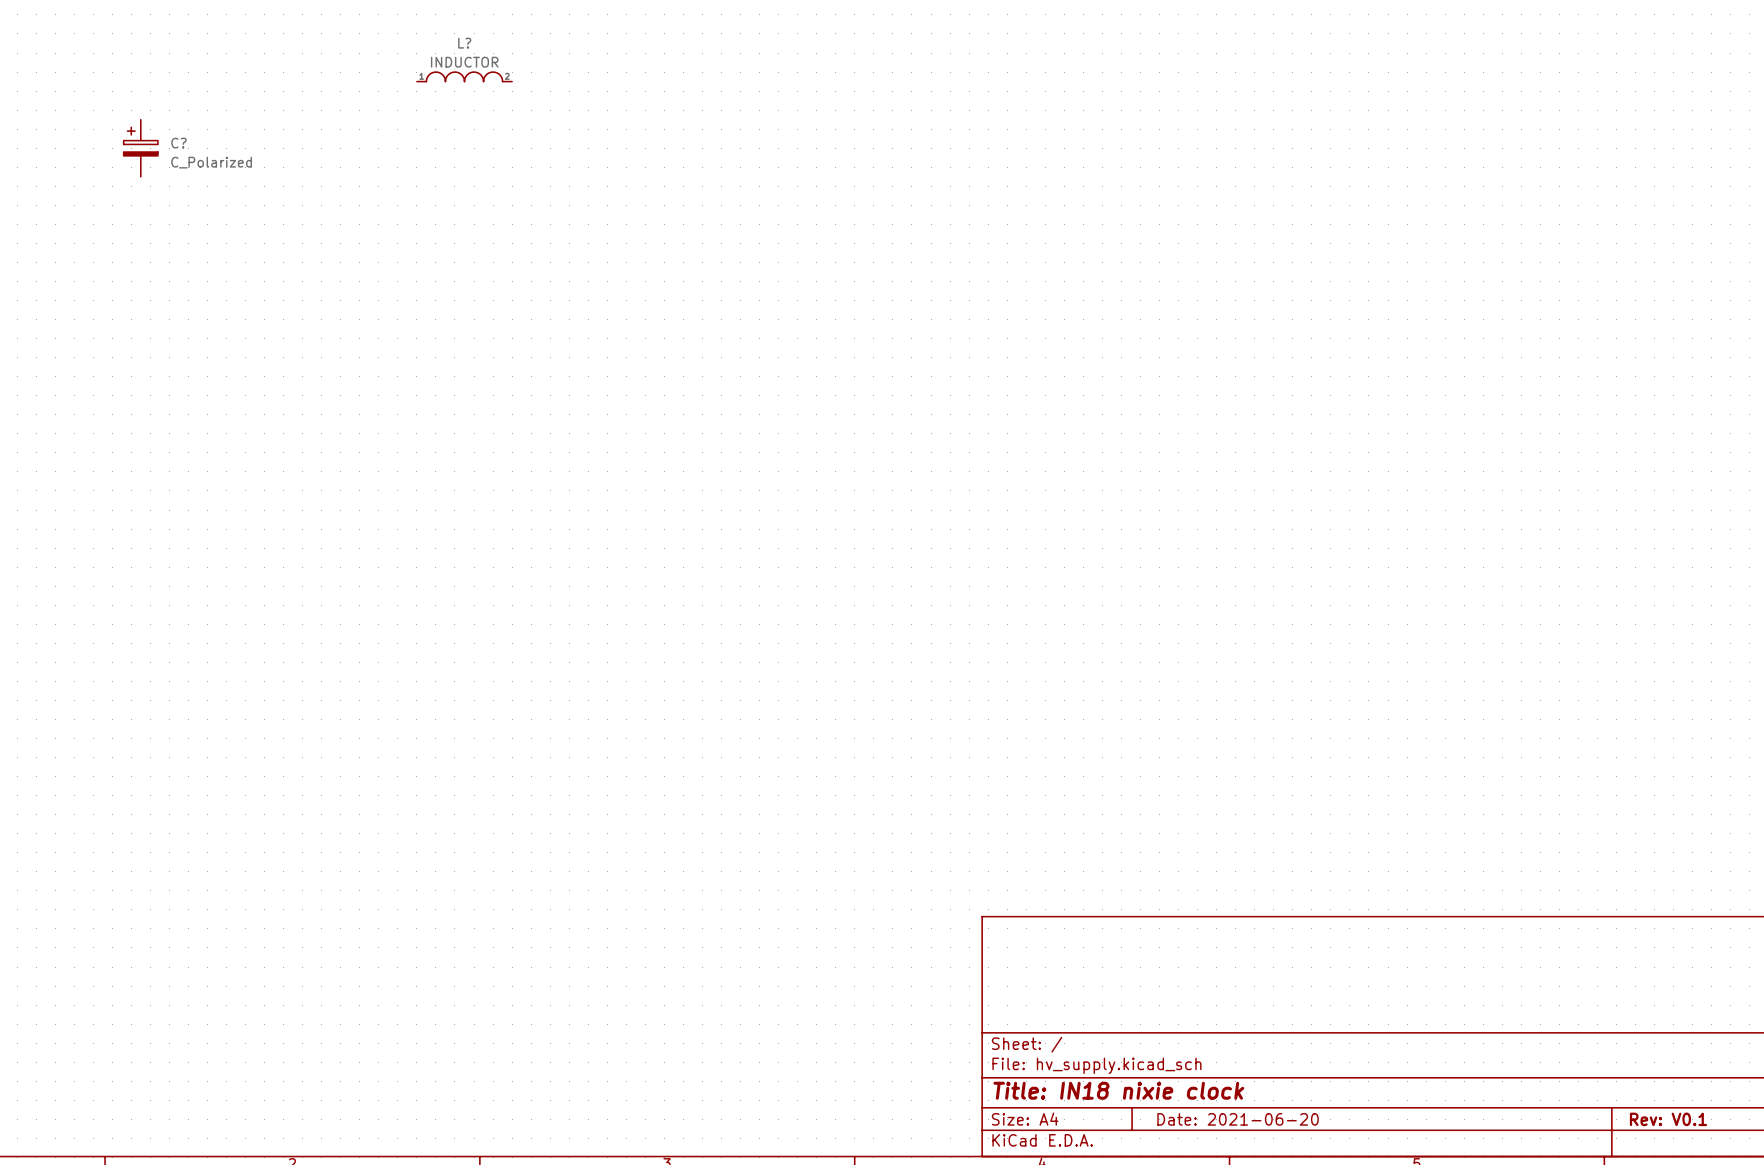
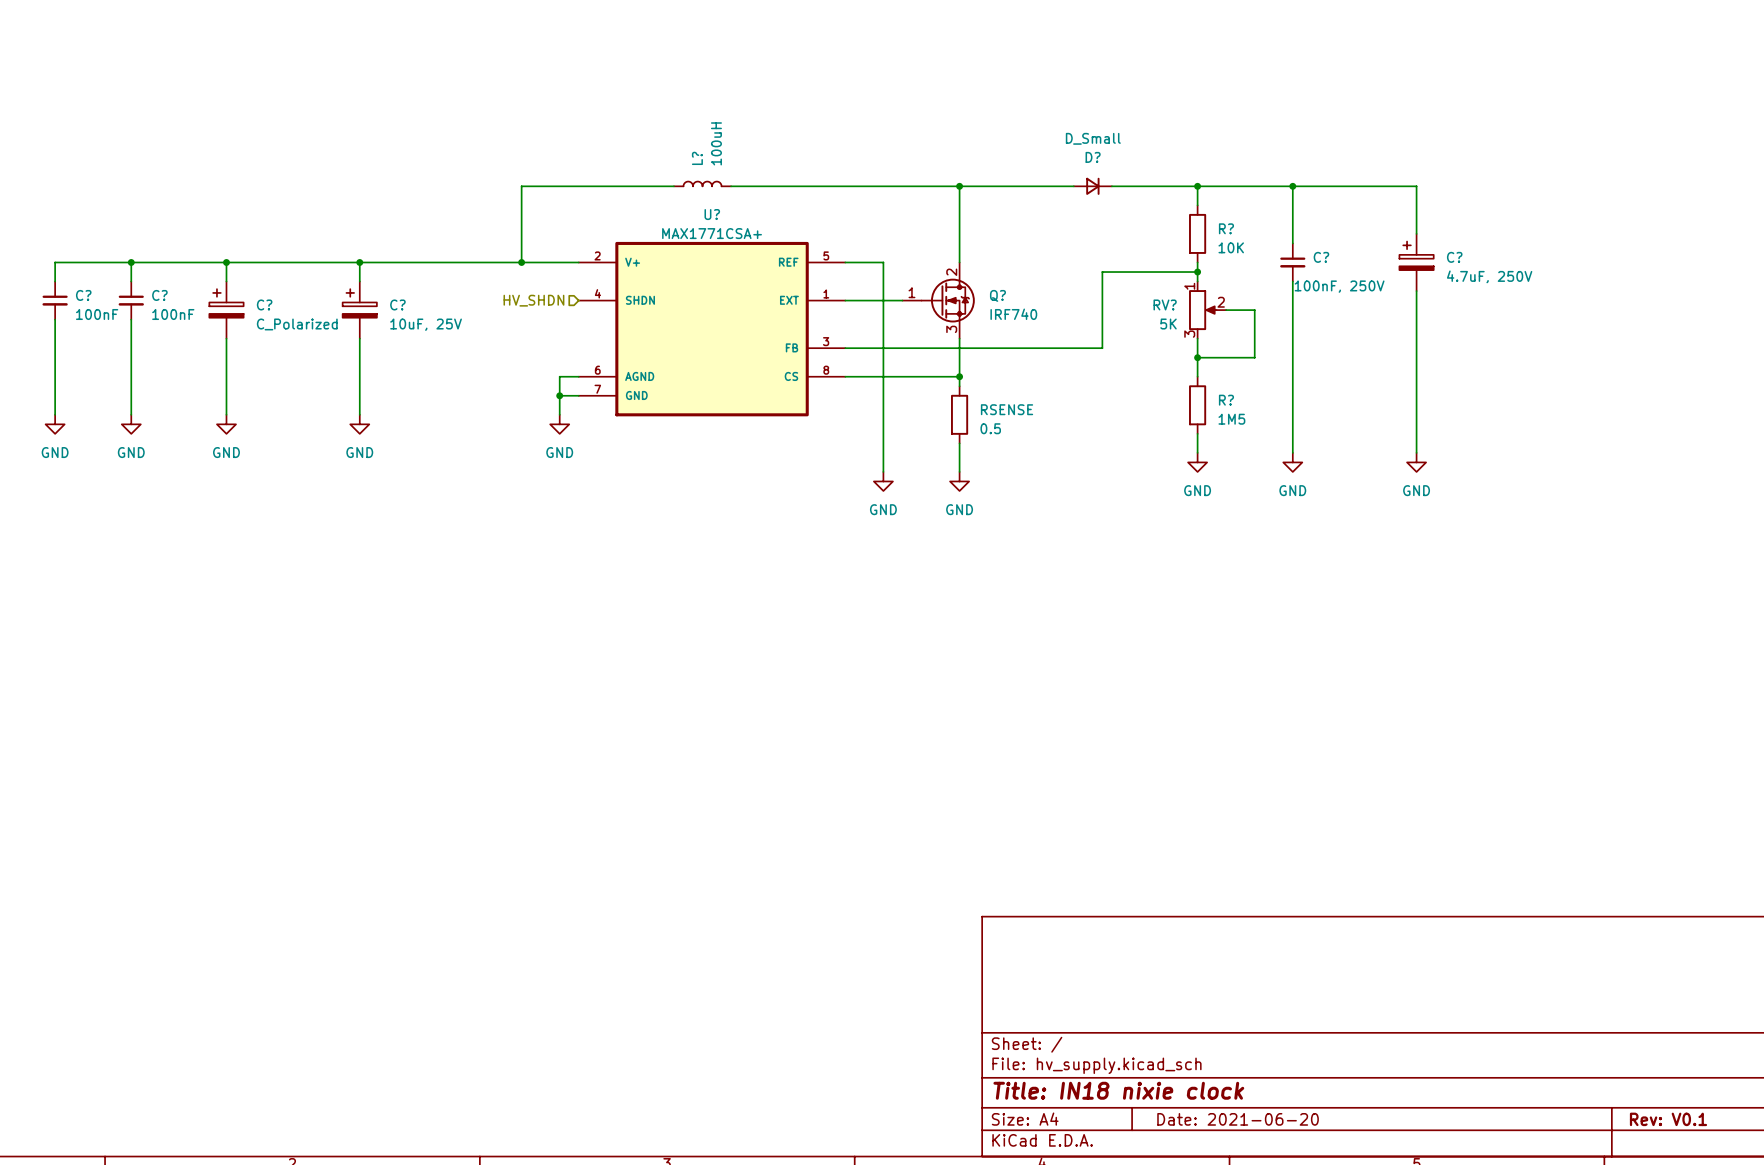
L?: INDUCTOR (464, 76) -> none
C? position: (140, 148) -> (226, 310)
L?: none -> 100uH (702, 183)
wire: none -> (673, 186) (521, 186) (521, 262)
wire: none -> (731, 186) (1073, 186)
wire: none -> (959, 186) (959, 262)
junction: none -> (959, 186)
D?: none -> D_Small (1092, 186)
wire: none -> (1111, 186) (1416, 186) (1416, 233)
wire: none -> (1197, 186) (1197, 205)
junction: none -> (1197, 186)
wire: none -> (1292, 186) (1292, 243)
junction: none -> (1292, 186)
R?: none -> 10K (1197, 233)
wire: none -> (131, 262) (131, 281)
junction: none -> (131, 262)
wire: none -> (226, 262) (226, 281)
junction: none -> (226, 262)
wire: none -> (359, 262) (359, 281)
junction: none -> (359, 262)
junction: none -> (521, 262)
wire: none -> (578, 262) (55, 262) (55, 281)
wire: none -> (845, 262) (883, 262) (883, 471)
wire: none -> (1197, 262) (1197, 281)
C?: none -> 100nF, 250V (1292, 262)
C?: none -> 4.7uF, 250V (1416, 262)
wire: none -> (1197, 272) (1102, 272) (1102, 348) (845, 348)
junction: none -> (1197, 272)
wire: none -> (1292, 281) (1292, 452)
wire: none -> (1416, 291) (1416, 452)
C?: none -> 100nF (55, 300)
C?: none -> 100nF (131, 300)
hierarchical label: none -> HV_SHDN (533, 300)
wire: none -> (845, 300) (902, 300)
Q?: none -> IRF740 (938, 300)
C?: none -> 10uF, 25V (359, 310)
RV?: none -> 5K (1207, 310)
wire: none -> (1226, 310) (1254, 310) (1254, 357) (1197, 357)
wire: none -> (55, 319) (55, 414)
wire: none -> (131, 319) (131, 414)
U?: none -> MAX1771CSA+ (712, 329)
wire: none -> (226, 338) (226, 414)
wire: none -> (359, 338) (359, 414)
wire: none -> (959, 338) (959, 386)
wire: none -> (1197, 338) (1197, 376)
junction: none -> (1197, 357)
wire: none -> (578, 376) (559, 376) (559, 414)
wire: none -> (845, 376) (959, 376)
junction: none -> (959, 376)
wire: none -> (559, 395) (578, 395)
junction: none -> (559, 395)
R?: none -> 1M5 (1197, 405)
RSENSE: none -> 0.5 (959, 414)
power symbol: none -> GND (55, 424)
power symbol: none -> GND (131, 424)
power symbol: none -> GND (226, 424)
power symbol: none -> GND (359, 424)
power symbol: none -> GND (559, 424)
wire: none -> (1197, 433) (1197, 452)
wire: none -> (959, 443) (959, 471)
power symbol: none -> GND (1197, 462)
power symbol: none -> GND (1292, 462)
power symbol: none -> GND (1416, 462)
power symbol: none -> GND (883, 481)
power symbol: none -> GND (959, 481)

